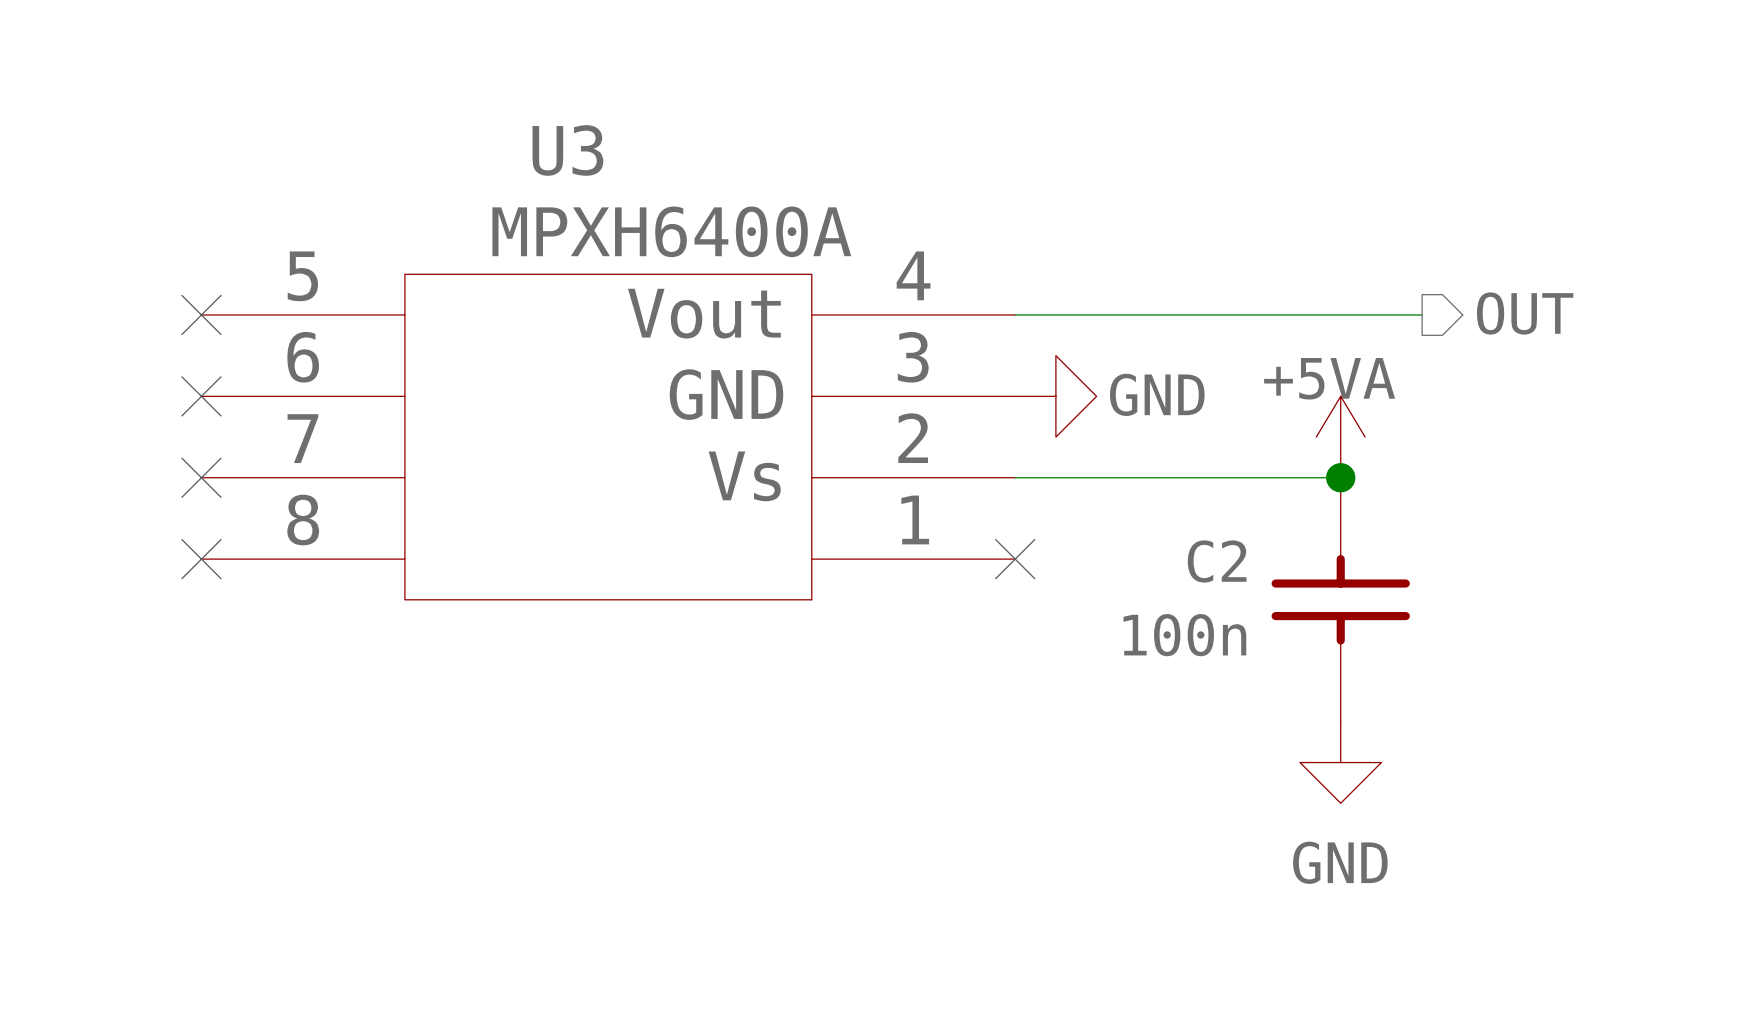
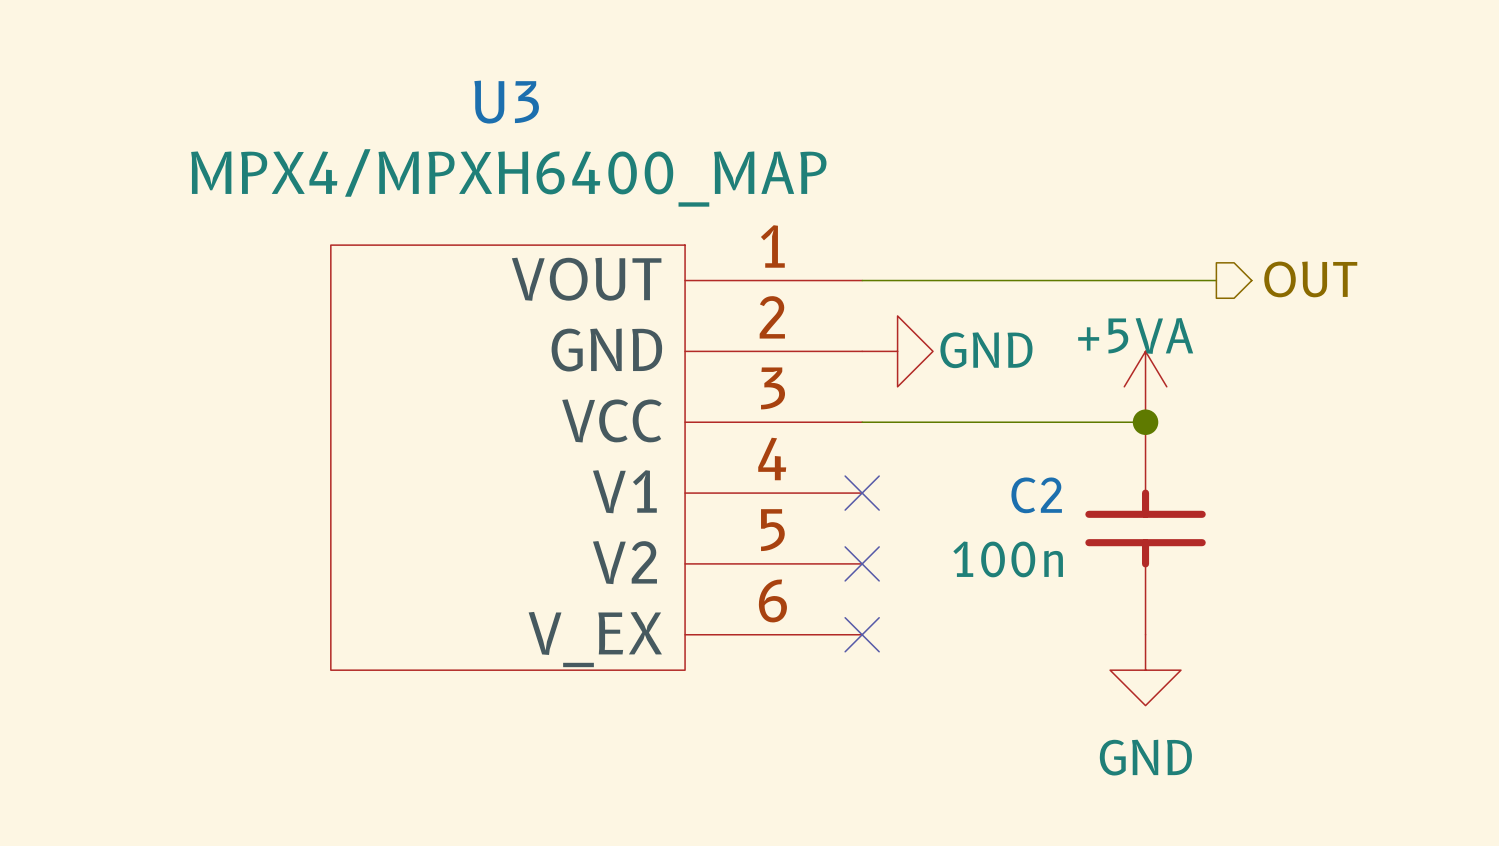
U3 name position: U3 (567, 150) -> U3 (506, 102)
U3 value: MPXH6400A (671, 231) -> MPX4/MPXH6400_MAP (508, 177)
U3 symbol: [201, 274, 1016, 600] -> [330, 245, 863, 671]
no-connect mark: (201, 314) -> none
no-connect mark: (201, 396) -> none
no-connect mark: (201, 477) -> none
no-connect mark: (201, 559) -> none
no-connect mark: none -> (862, 563)
no-connect mark: none -> (862, 634)

